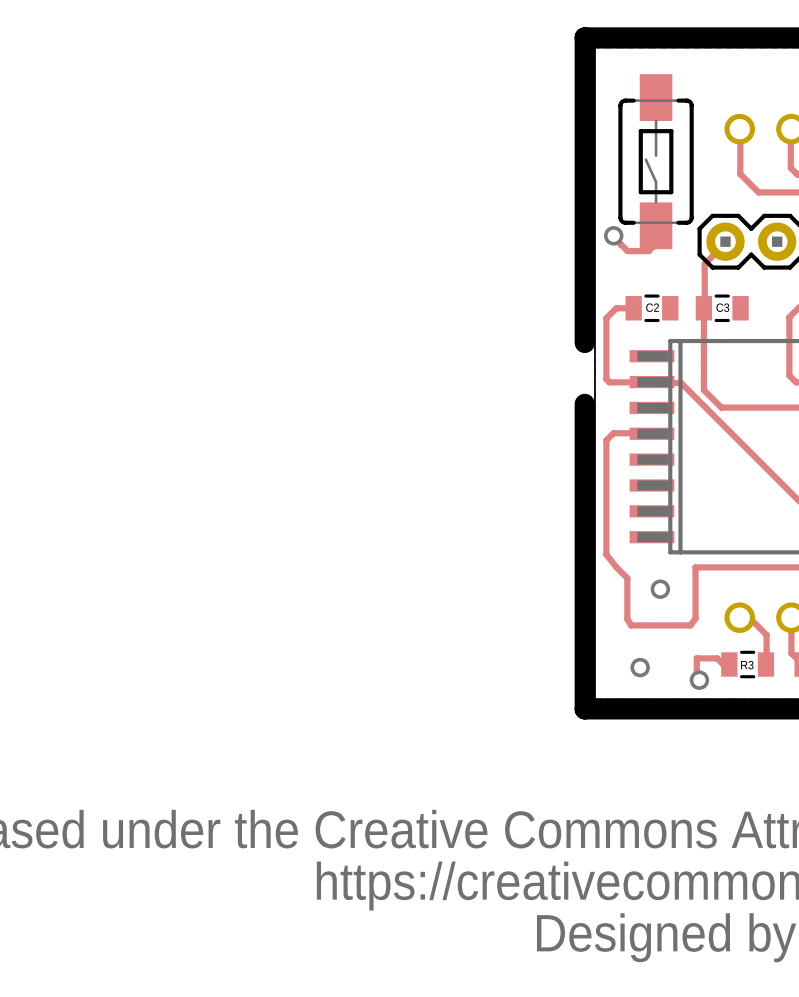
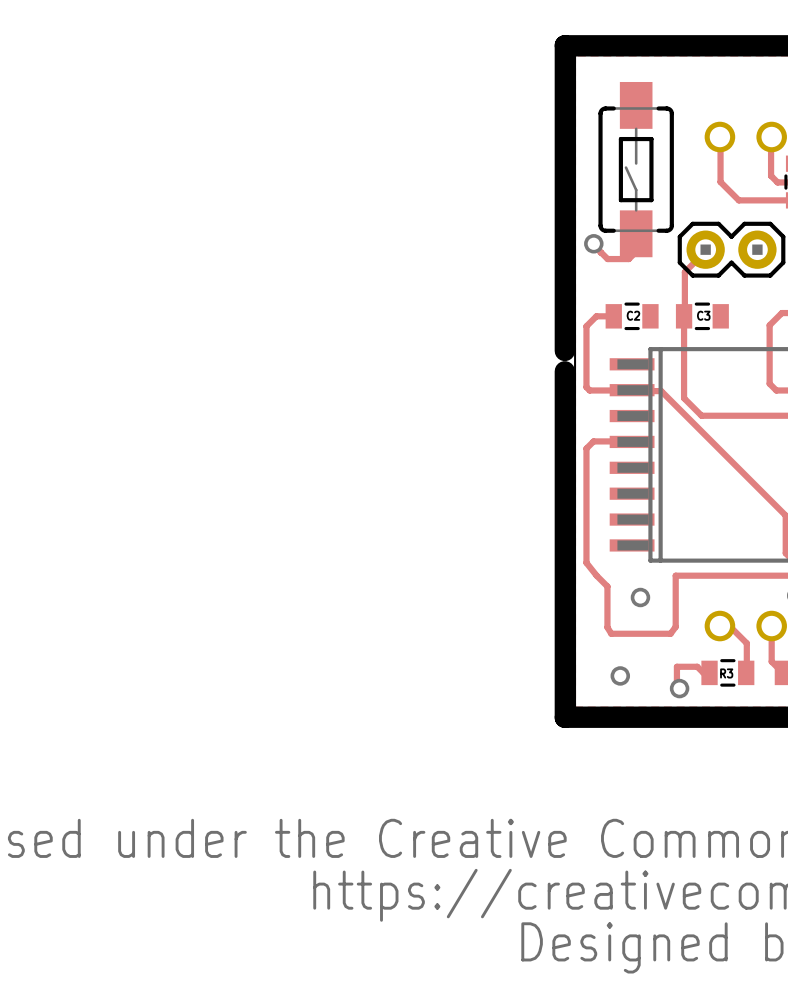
board edge: none -> (564, 371) (564, 412)

